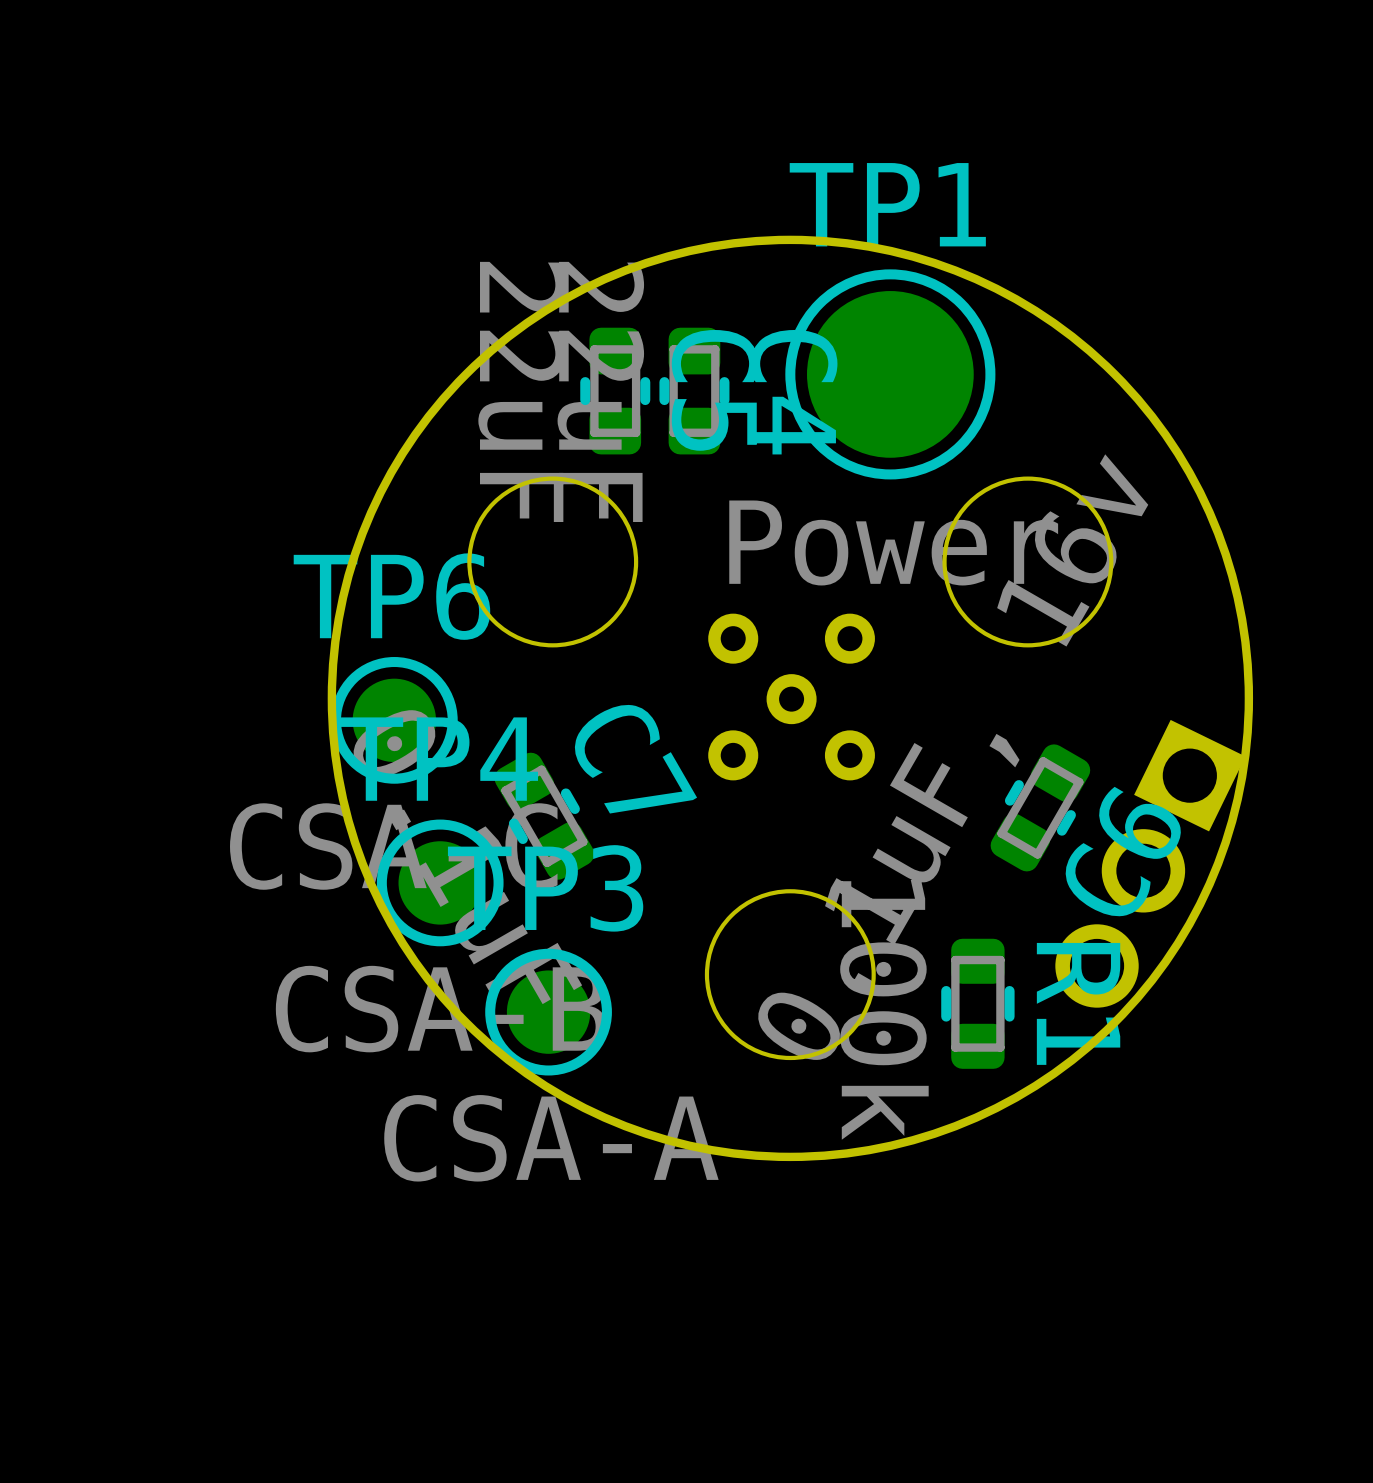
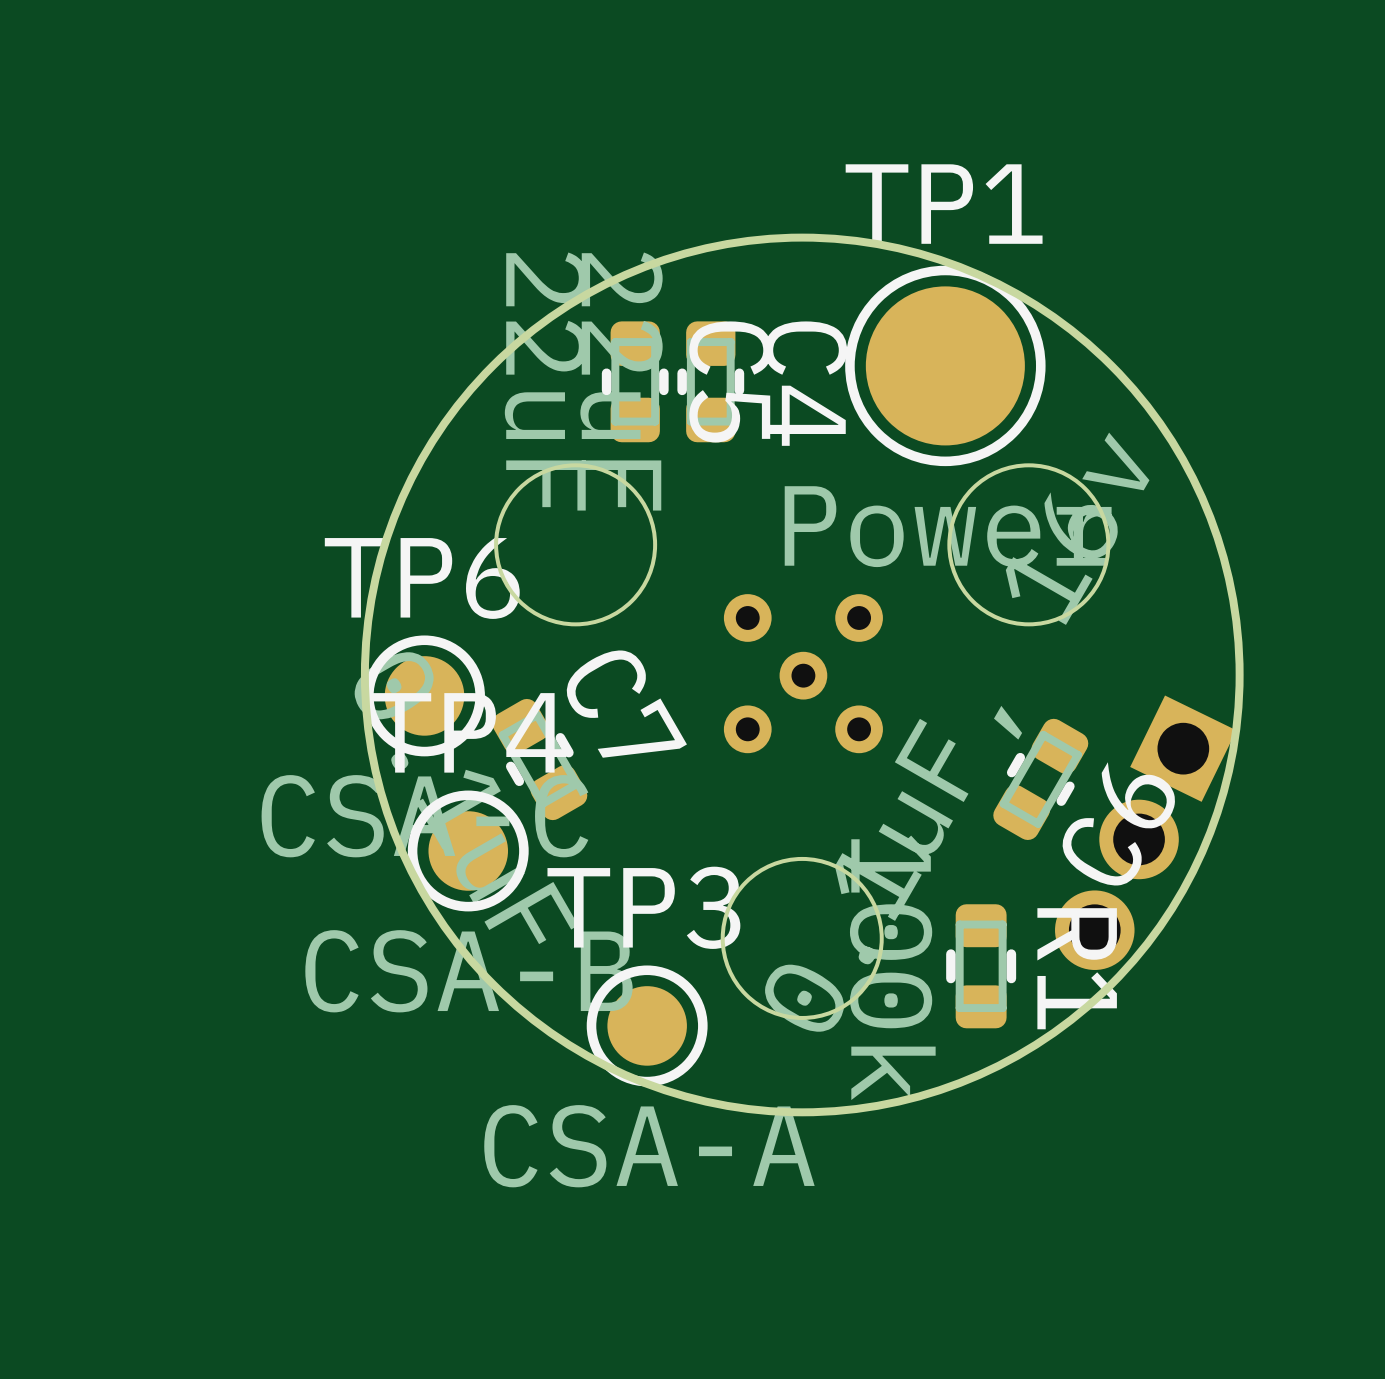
TP1 position: (890, 374) -> (945, 365)
C7 position: (544, 816) -> (539, 759)
TP3 position: (548, 1012) -> (647, 1025)

